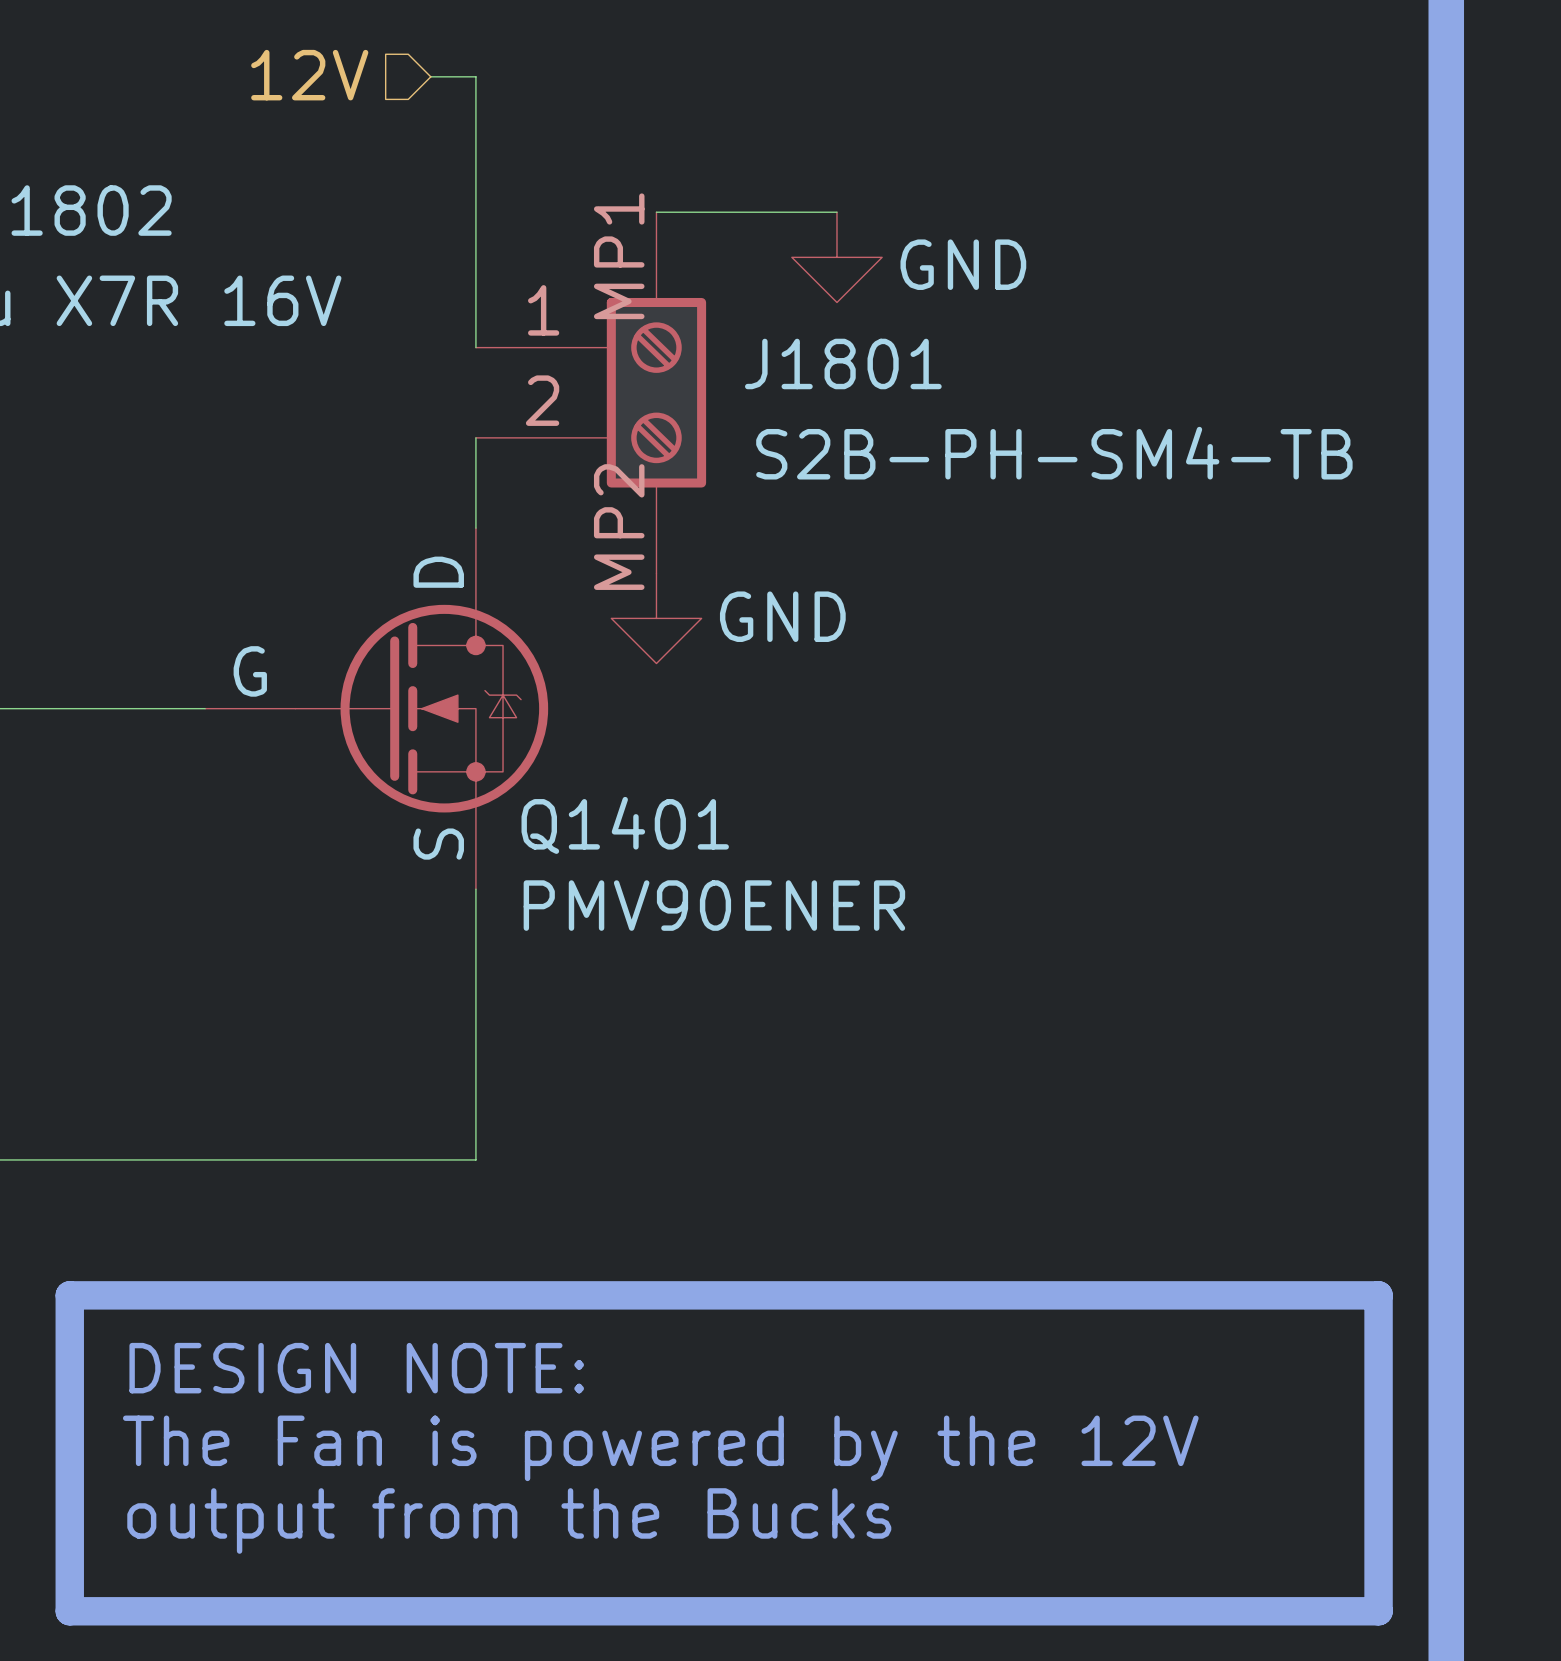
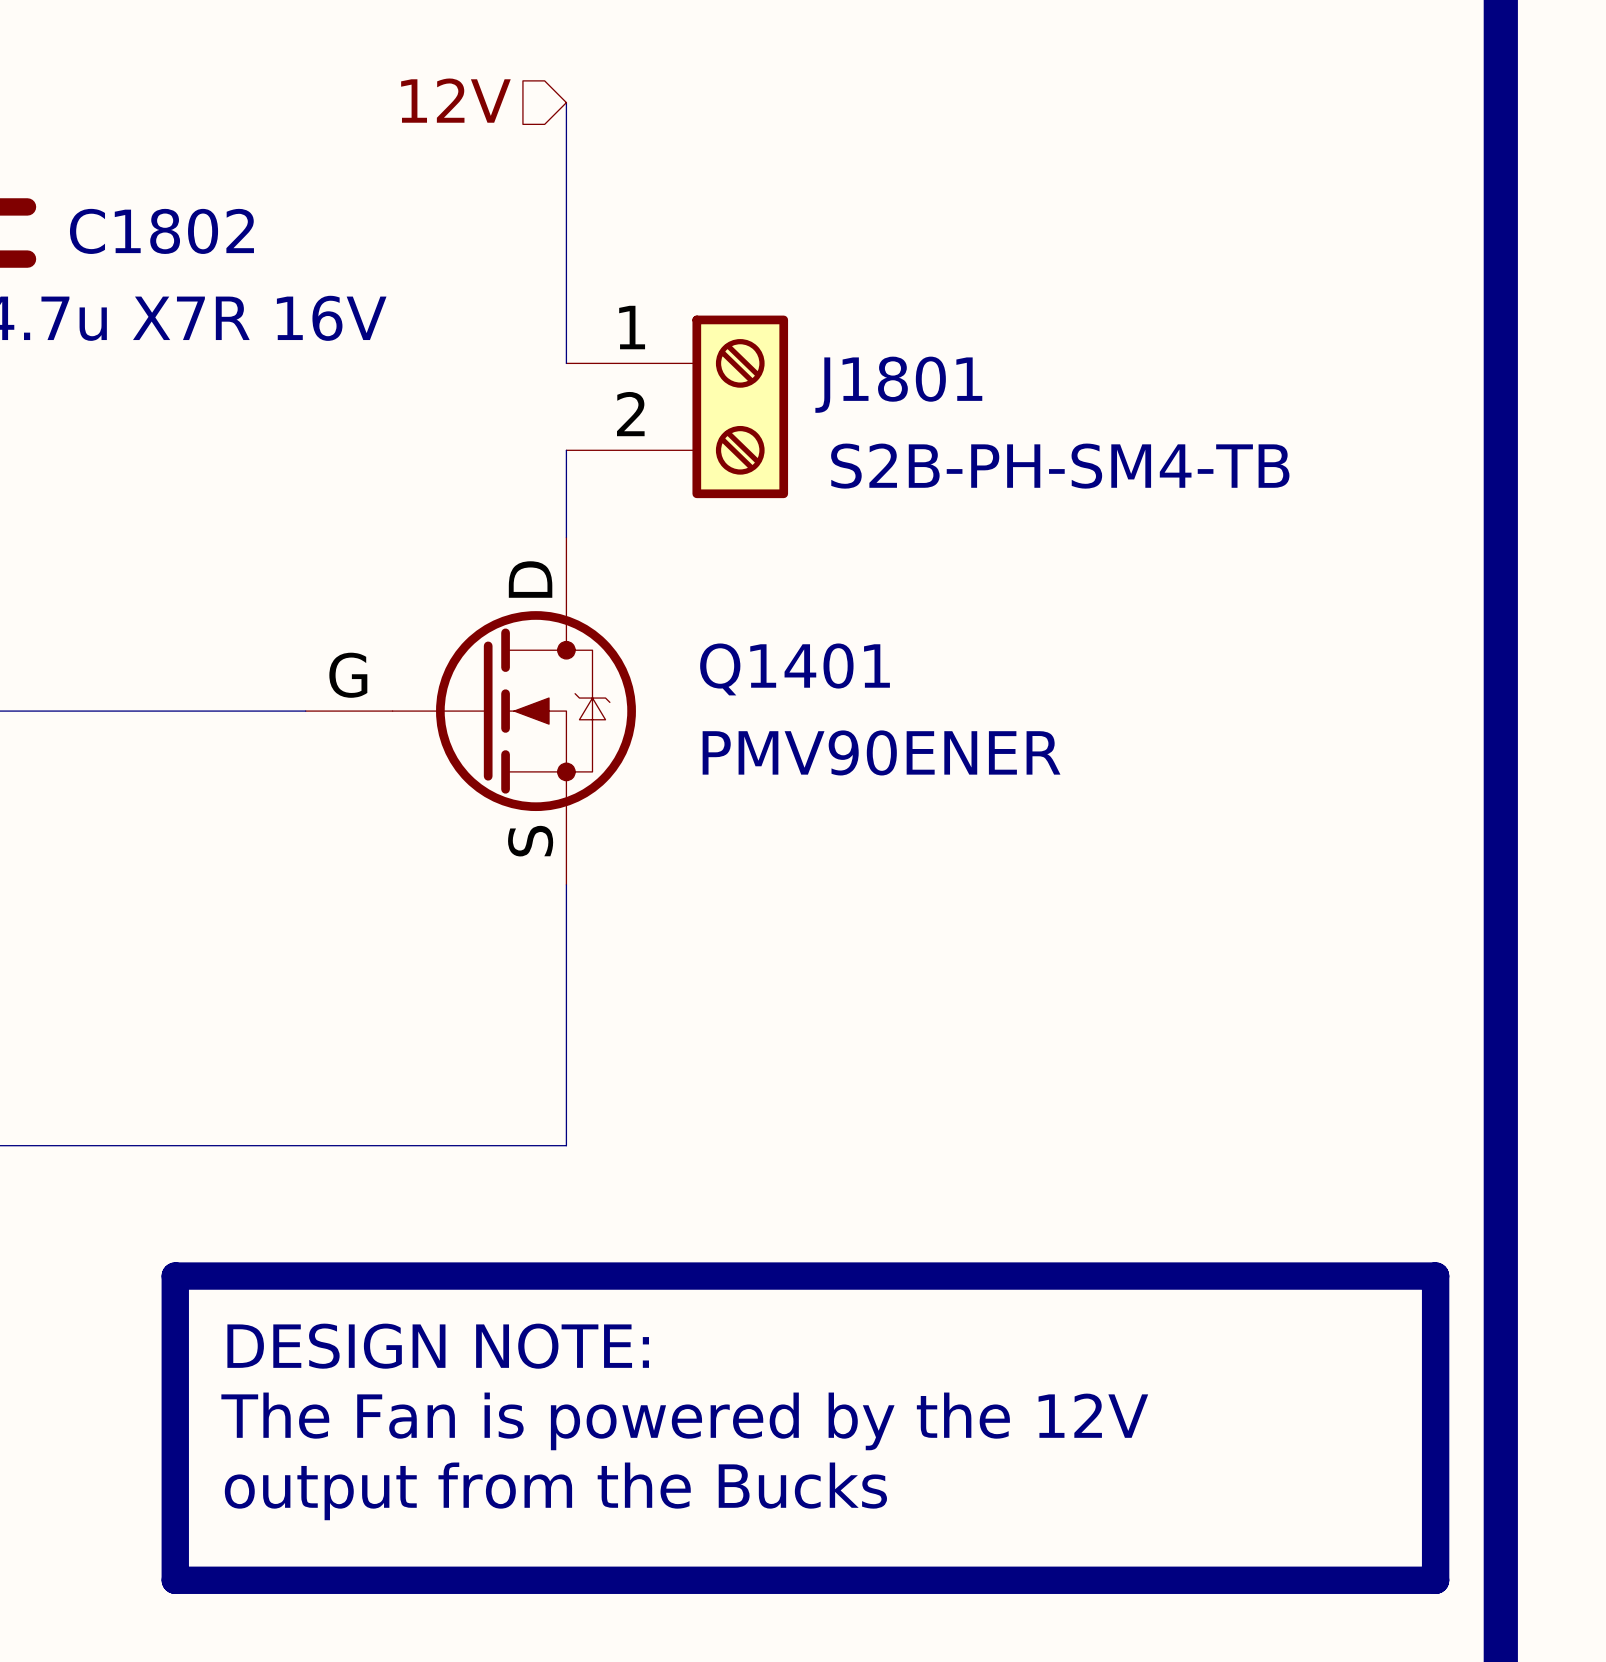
hierarchical label position: 12V (309, 75) -> 12V (455, 100)
wire: (430, 76) (475, 76) -> none
J1801 symbol: [475, 212, 707, 574] -> [566, 315, 789, 499]
wire: (656, 212) (836, 212) -> none
power symbol: GND (836, 257) -> none
power symbol: GND (656, 618) -> none
Q1401 name position: Q1401 (625, 825) -> Q1401 (795, 669)
Q1401 value position: PMV90ENER (714, 905) -> PMV90ENER (881, 752)

